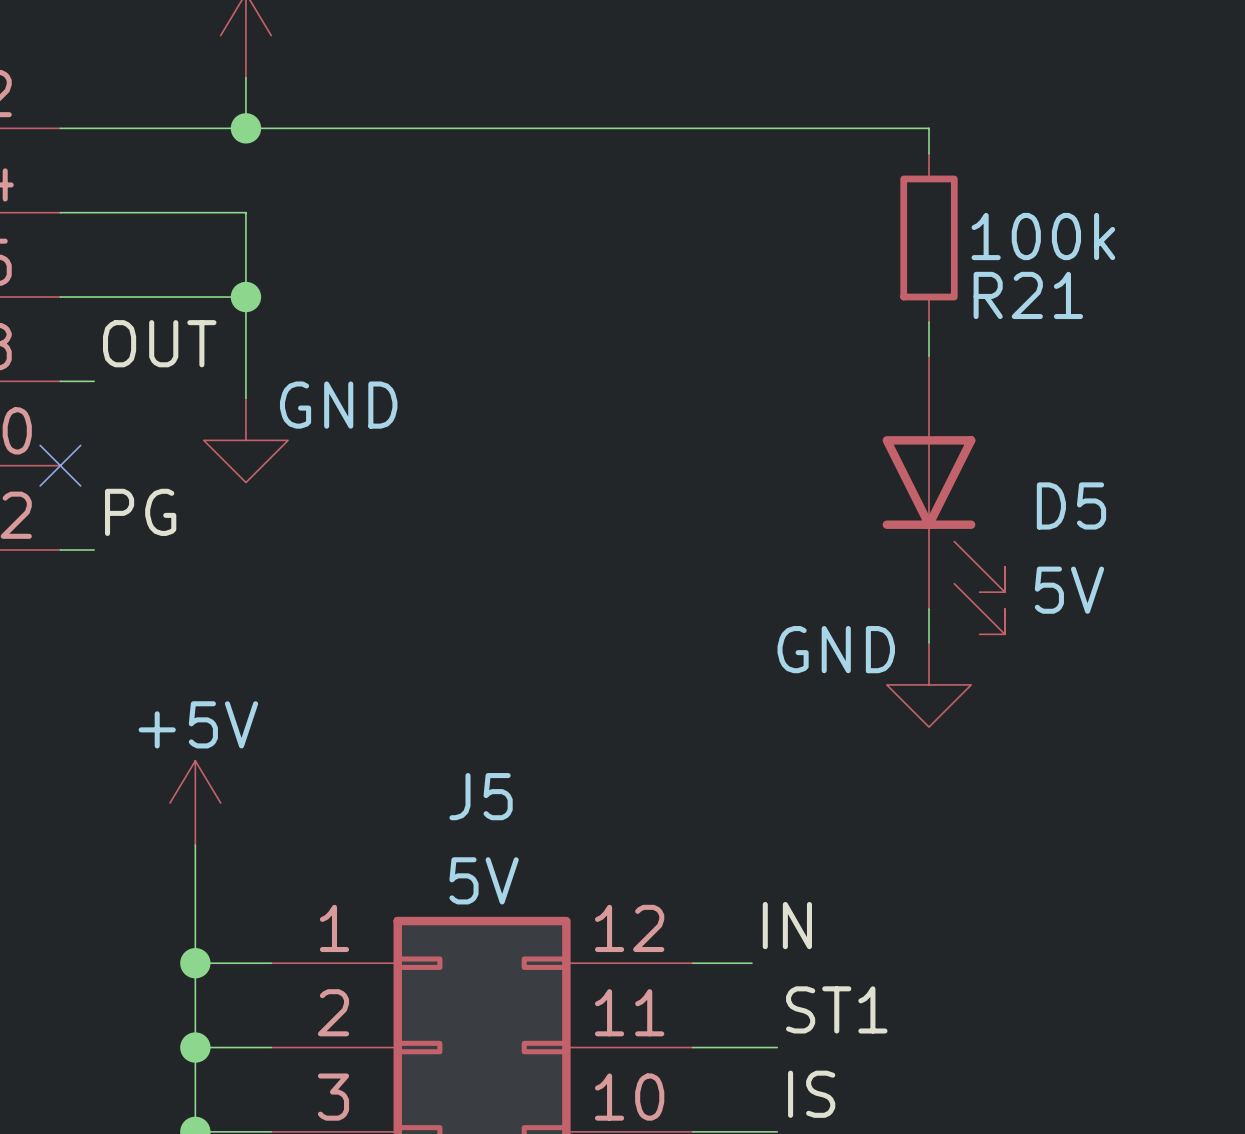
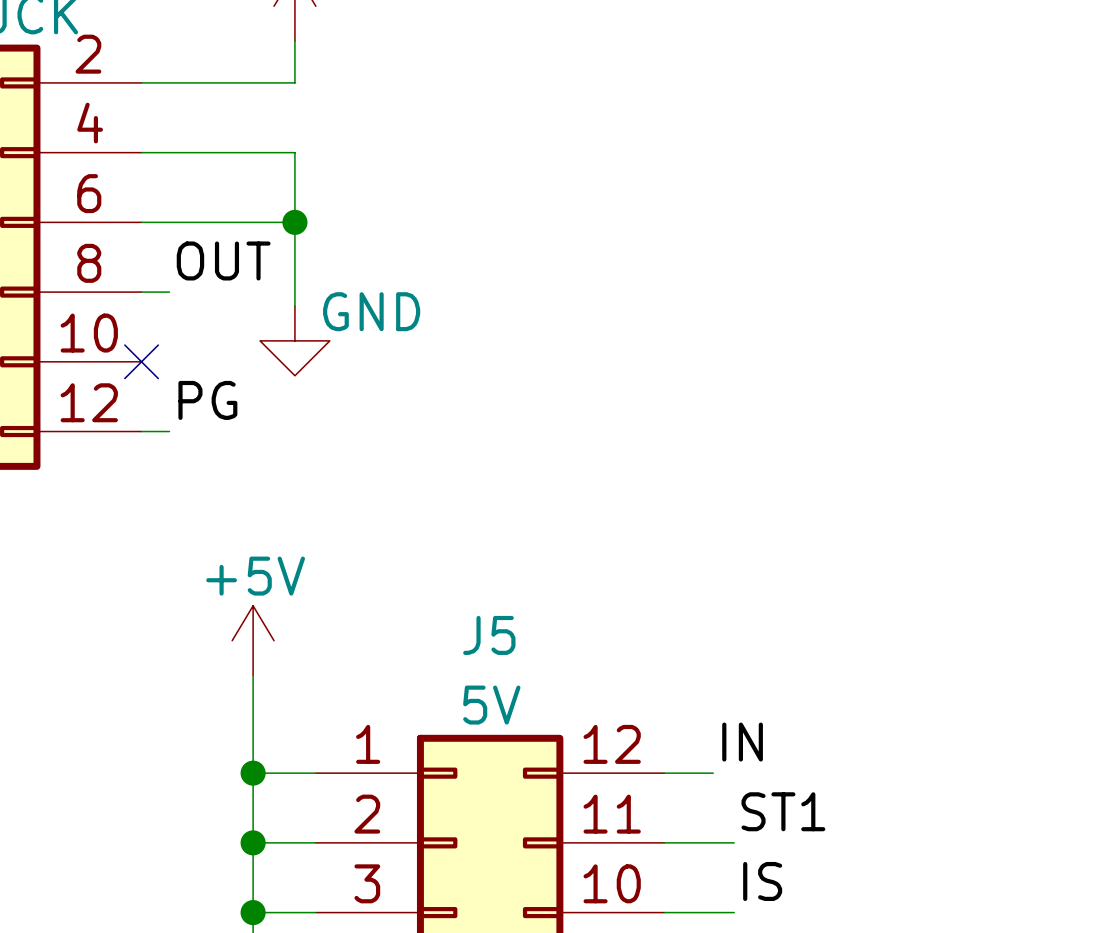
wire: (245, 128) (929, 128) (929, 153) -> none
junction: (245, 128) -> none
R21: 100k (929, 237) -> none
wire: (929, 322) (929, 356) -> none
D5: 5V (943, 495) -> none
wire: (929, 609) (929, 642) -> none
power symbol: GND (929, 684) -> none

